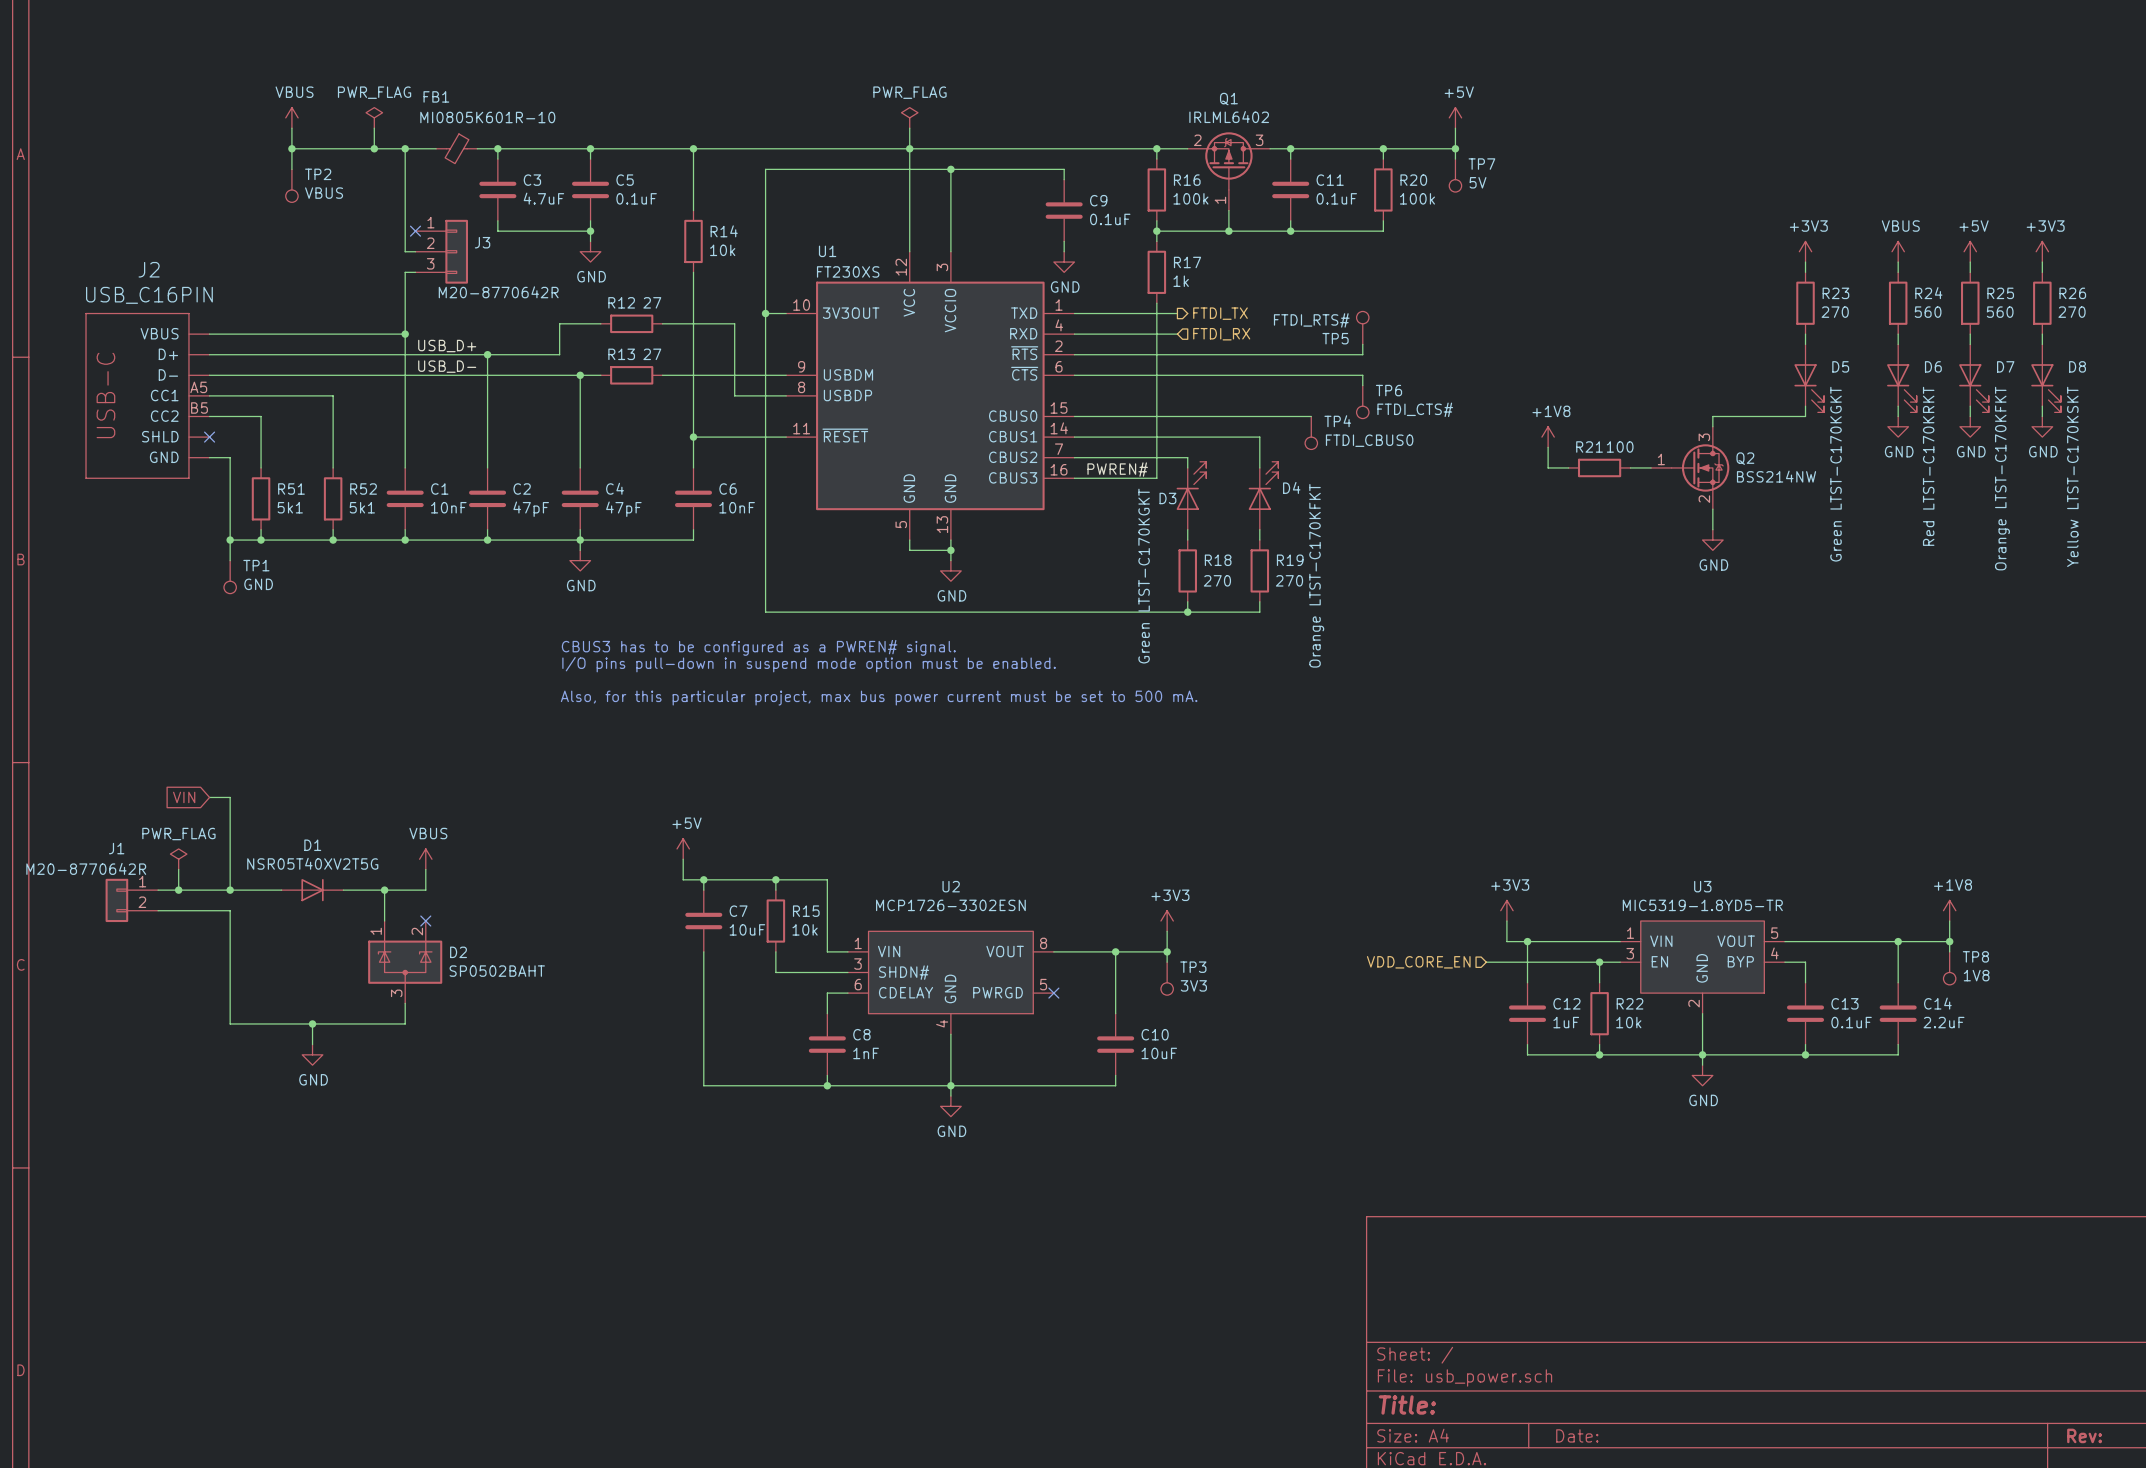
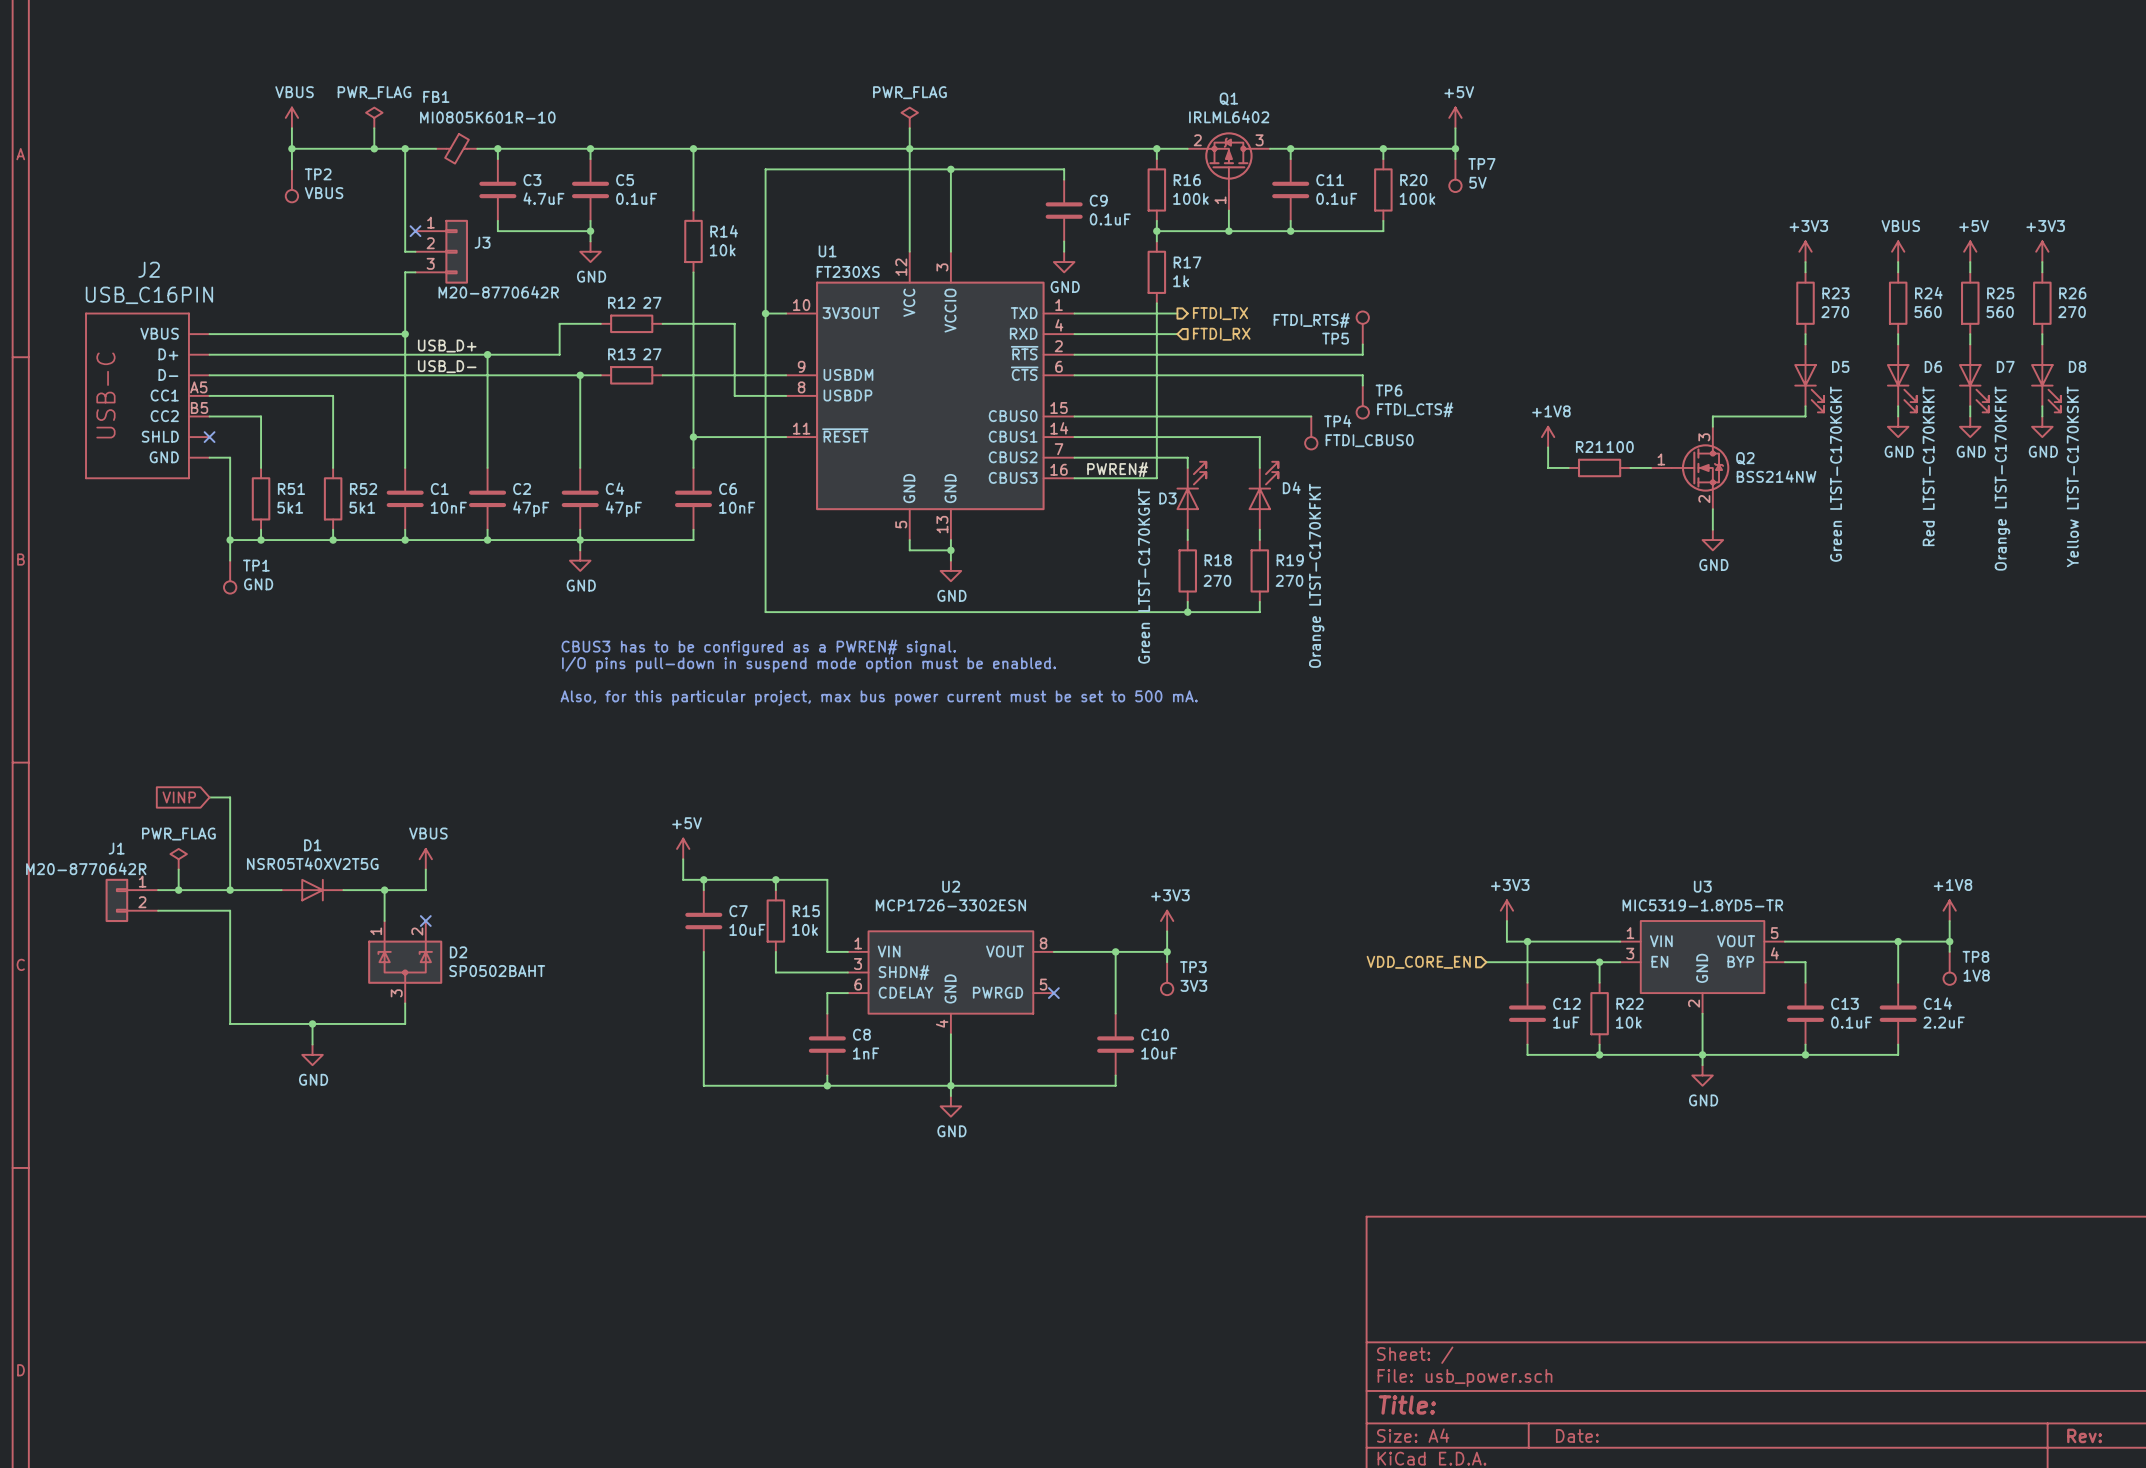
global label: VIN (184, 797) -> VINP (179, 797)

